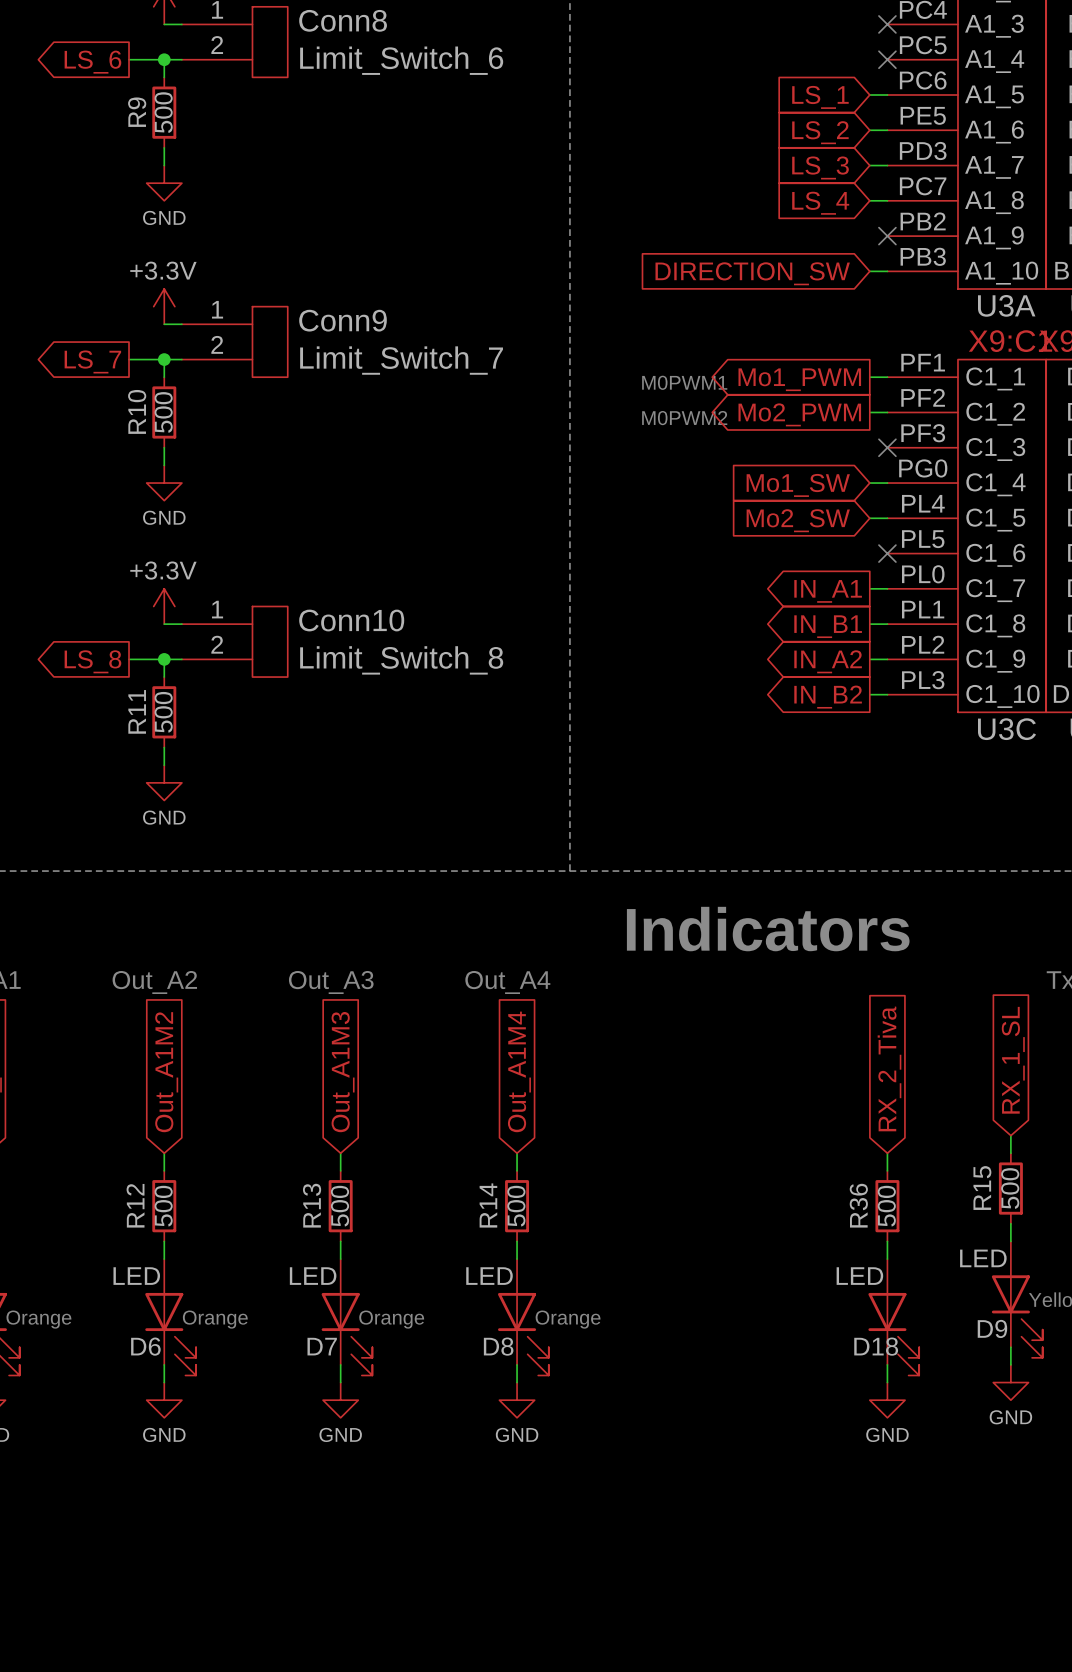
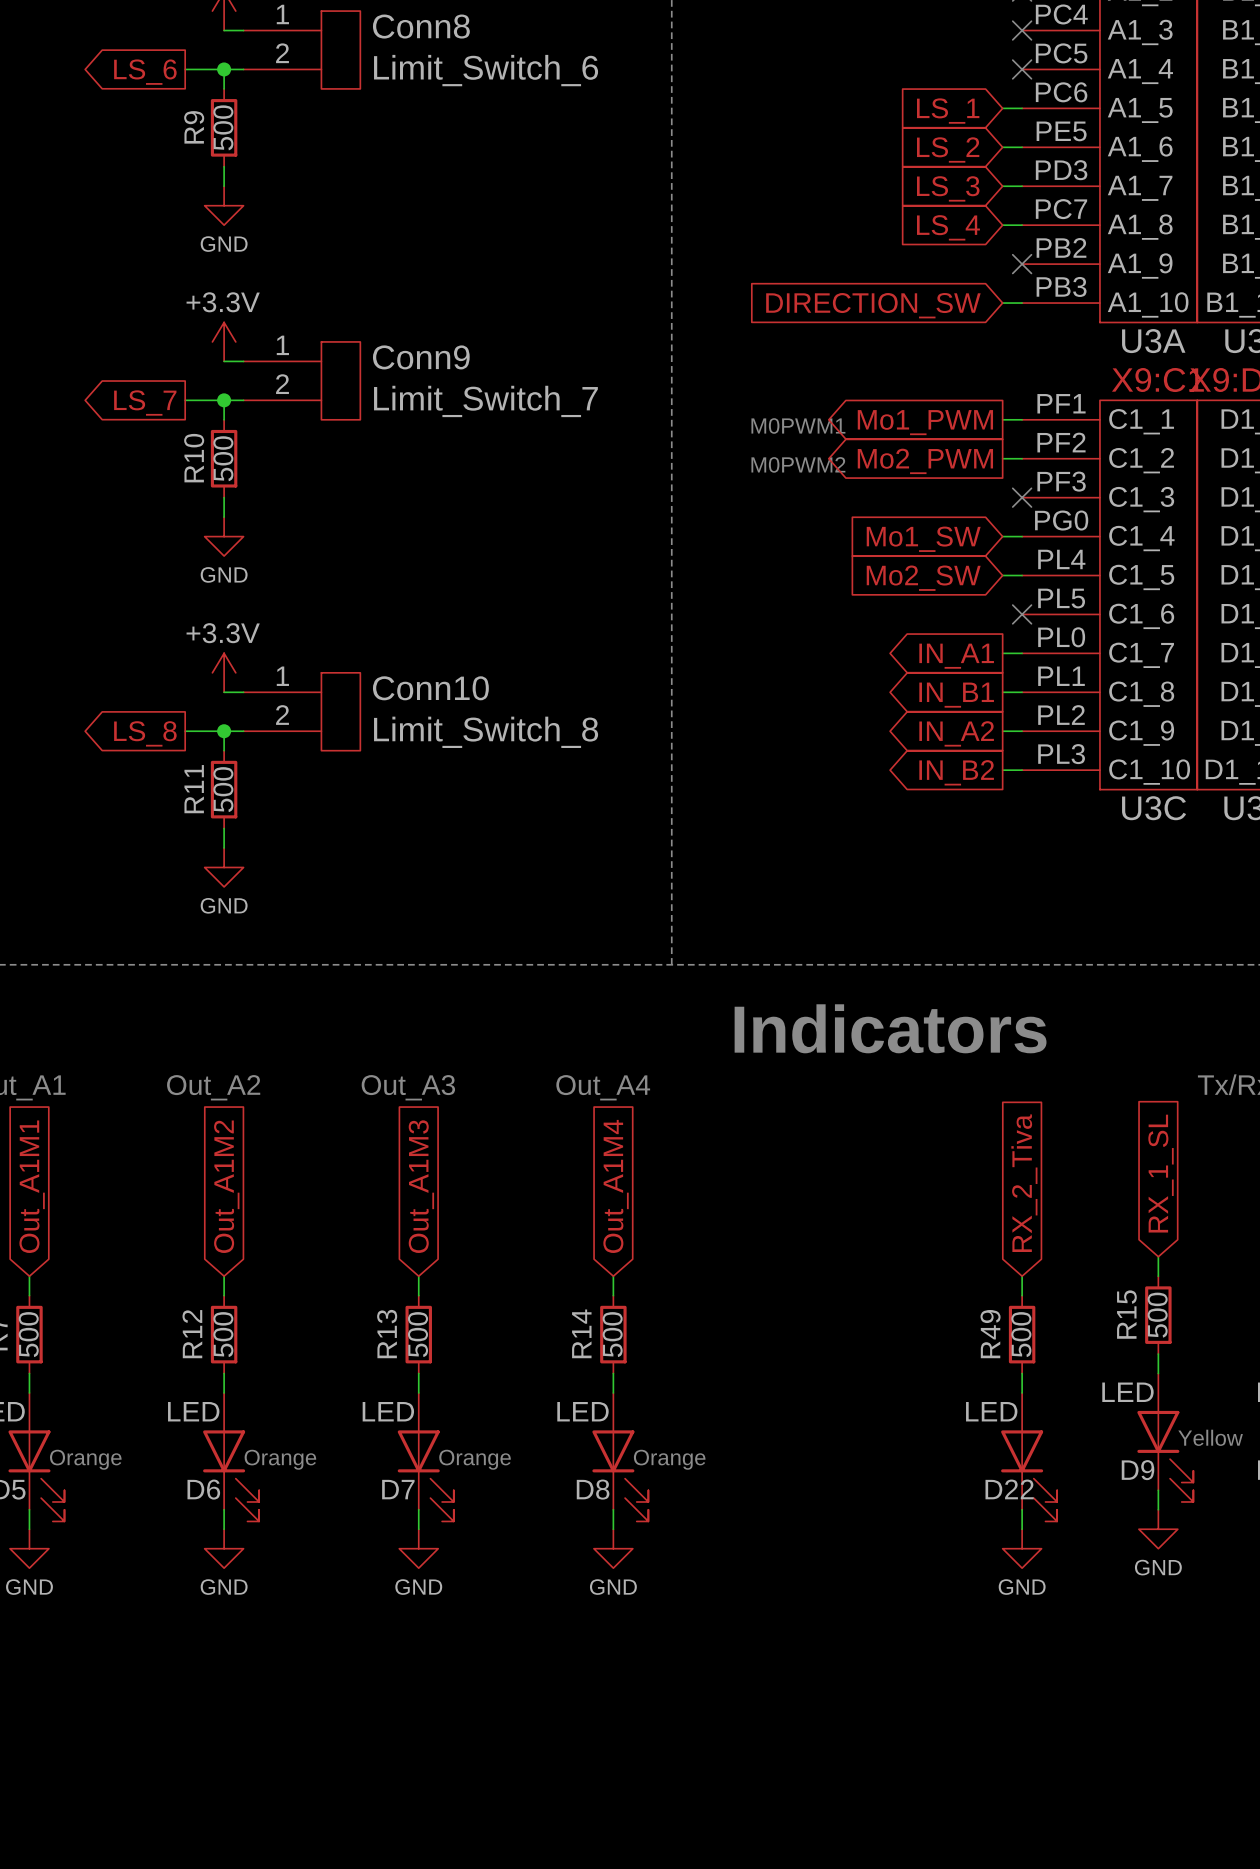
R36 name: R36 (858, 1205) -> R49 (990, 1334)
D18 name: D18 (876, 1346) -> D22 (1009, 1489)

